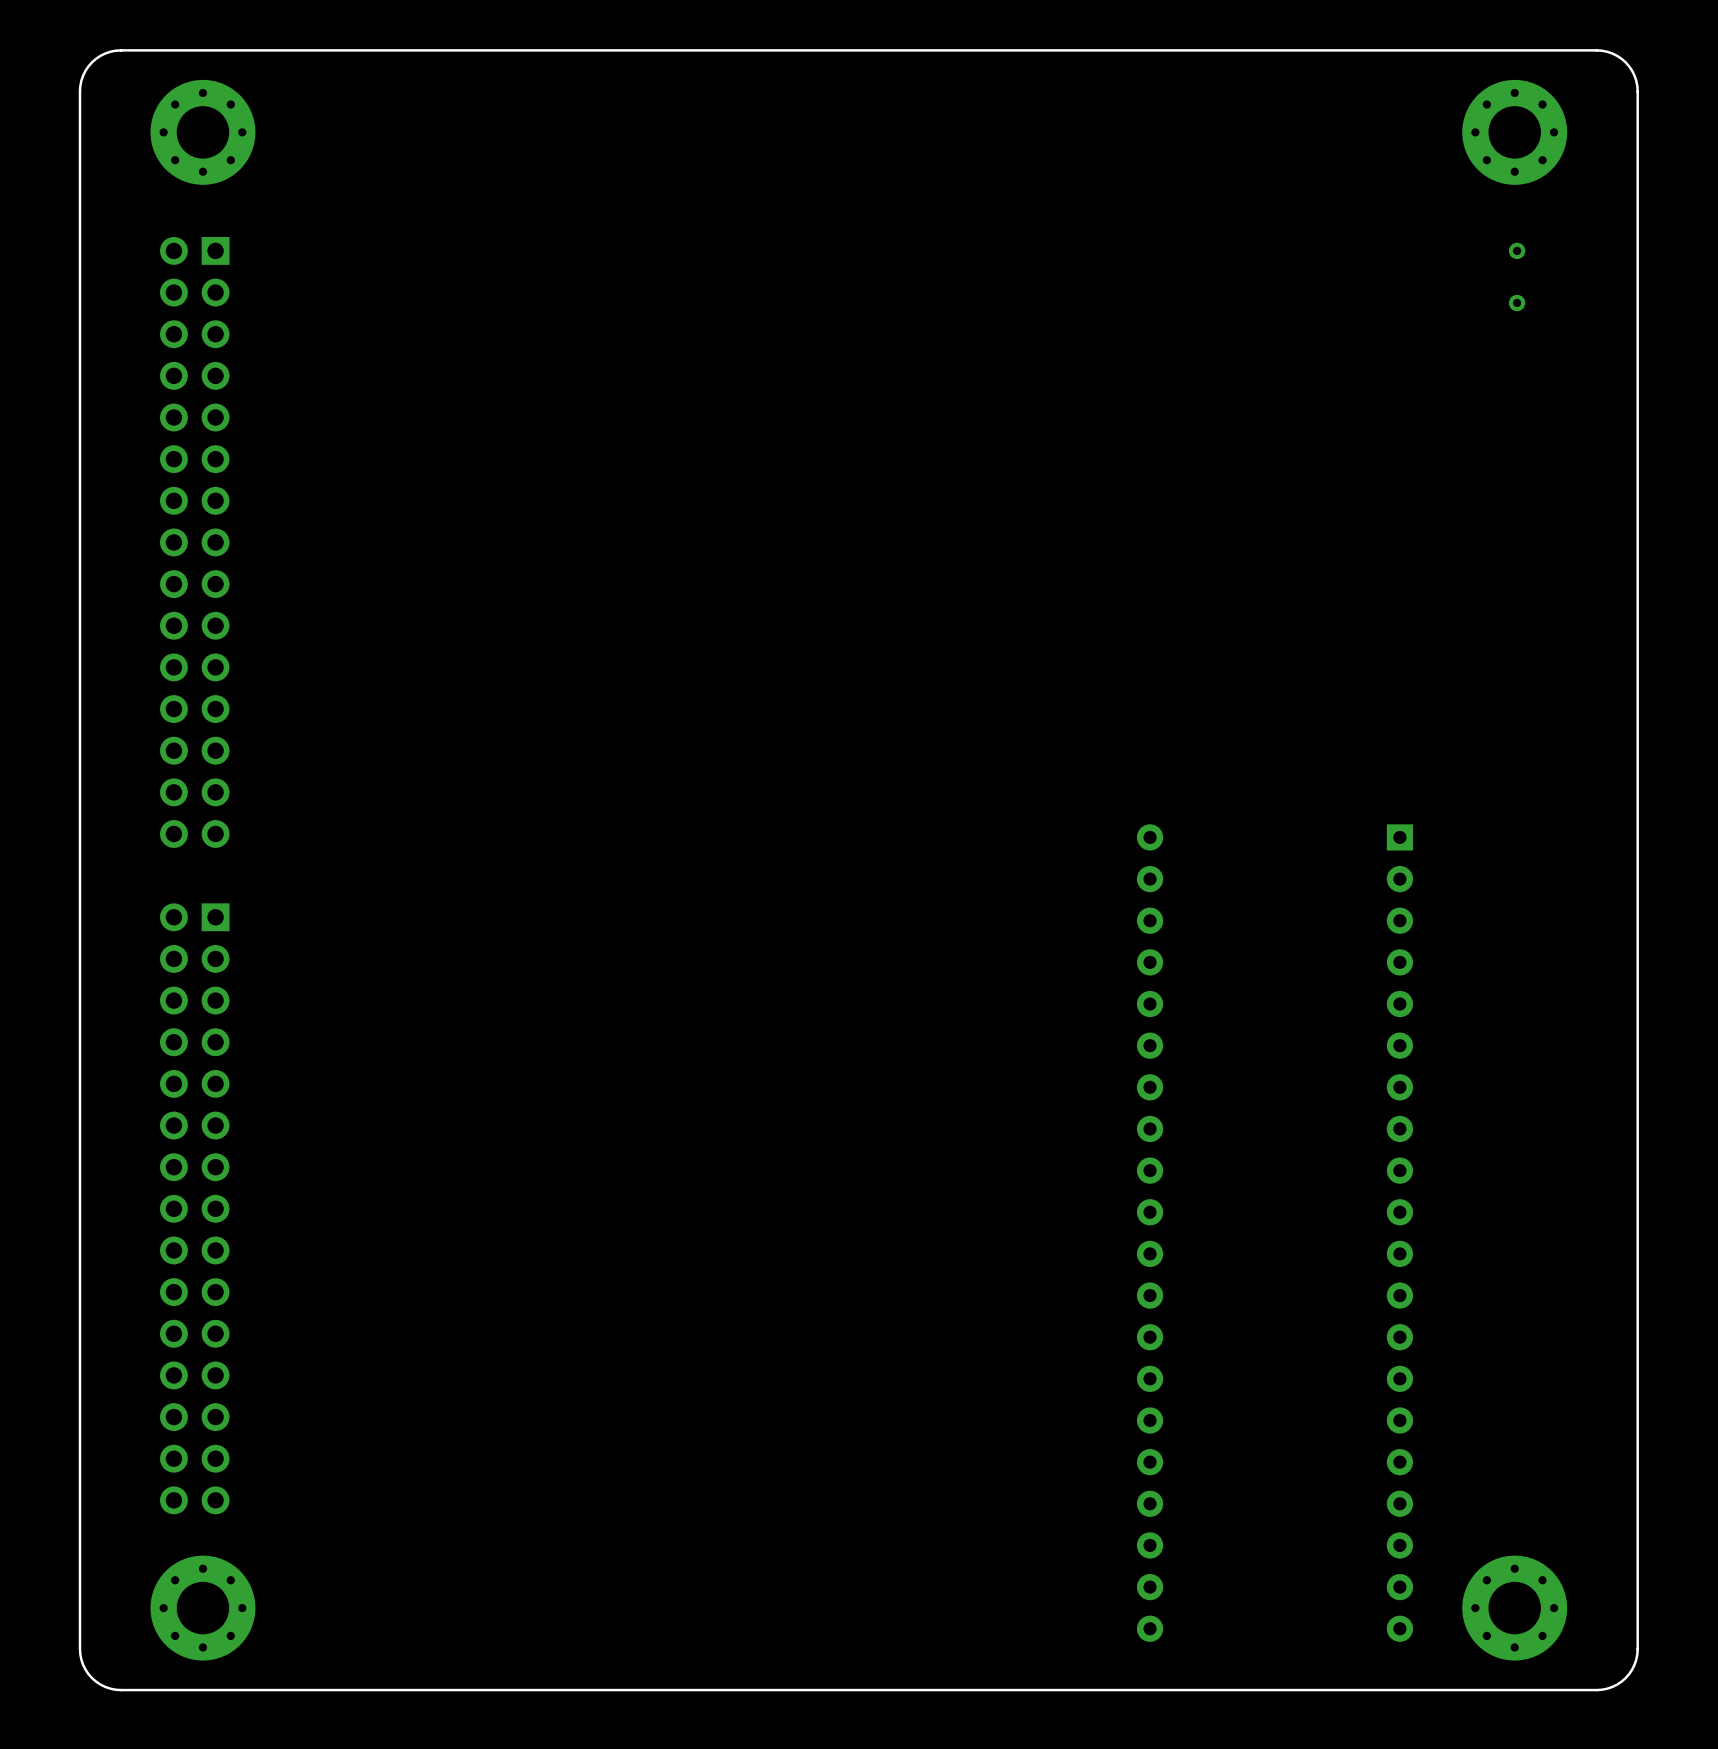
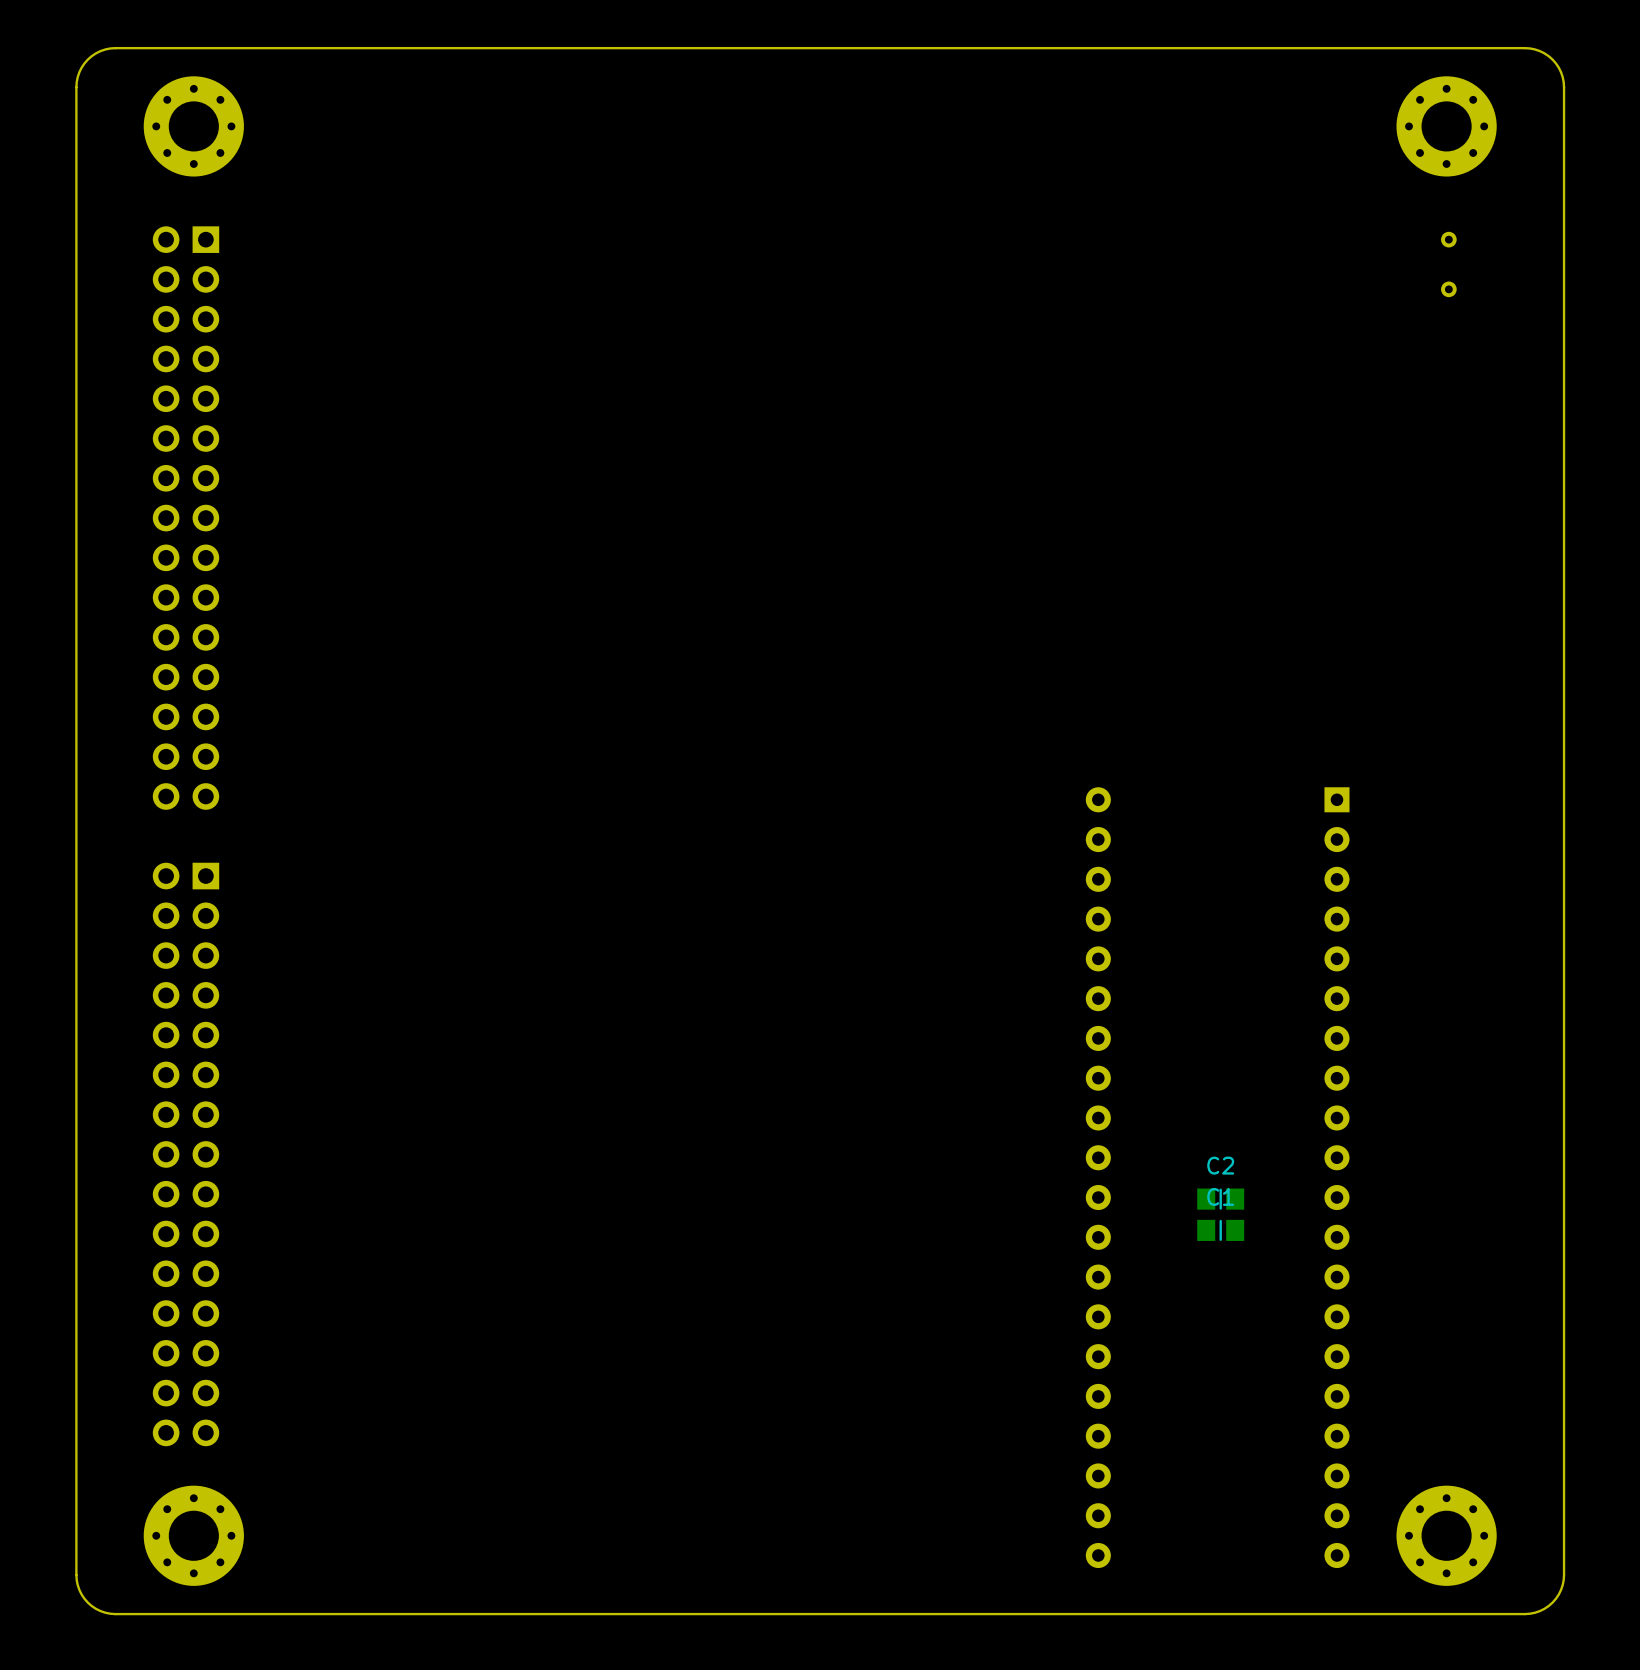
C2: none -> (1220, 1199)
C1: none -> (1220, 1230)

